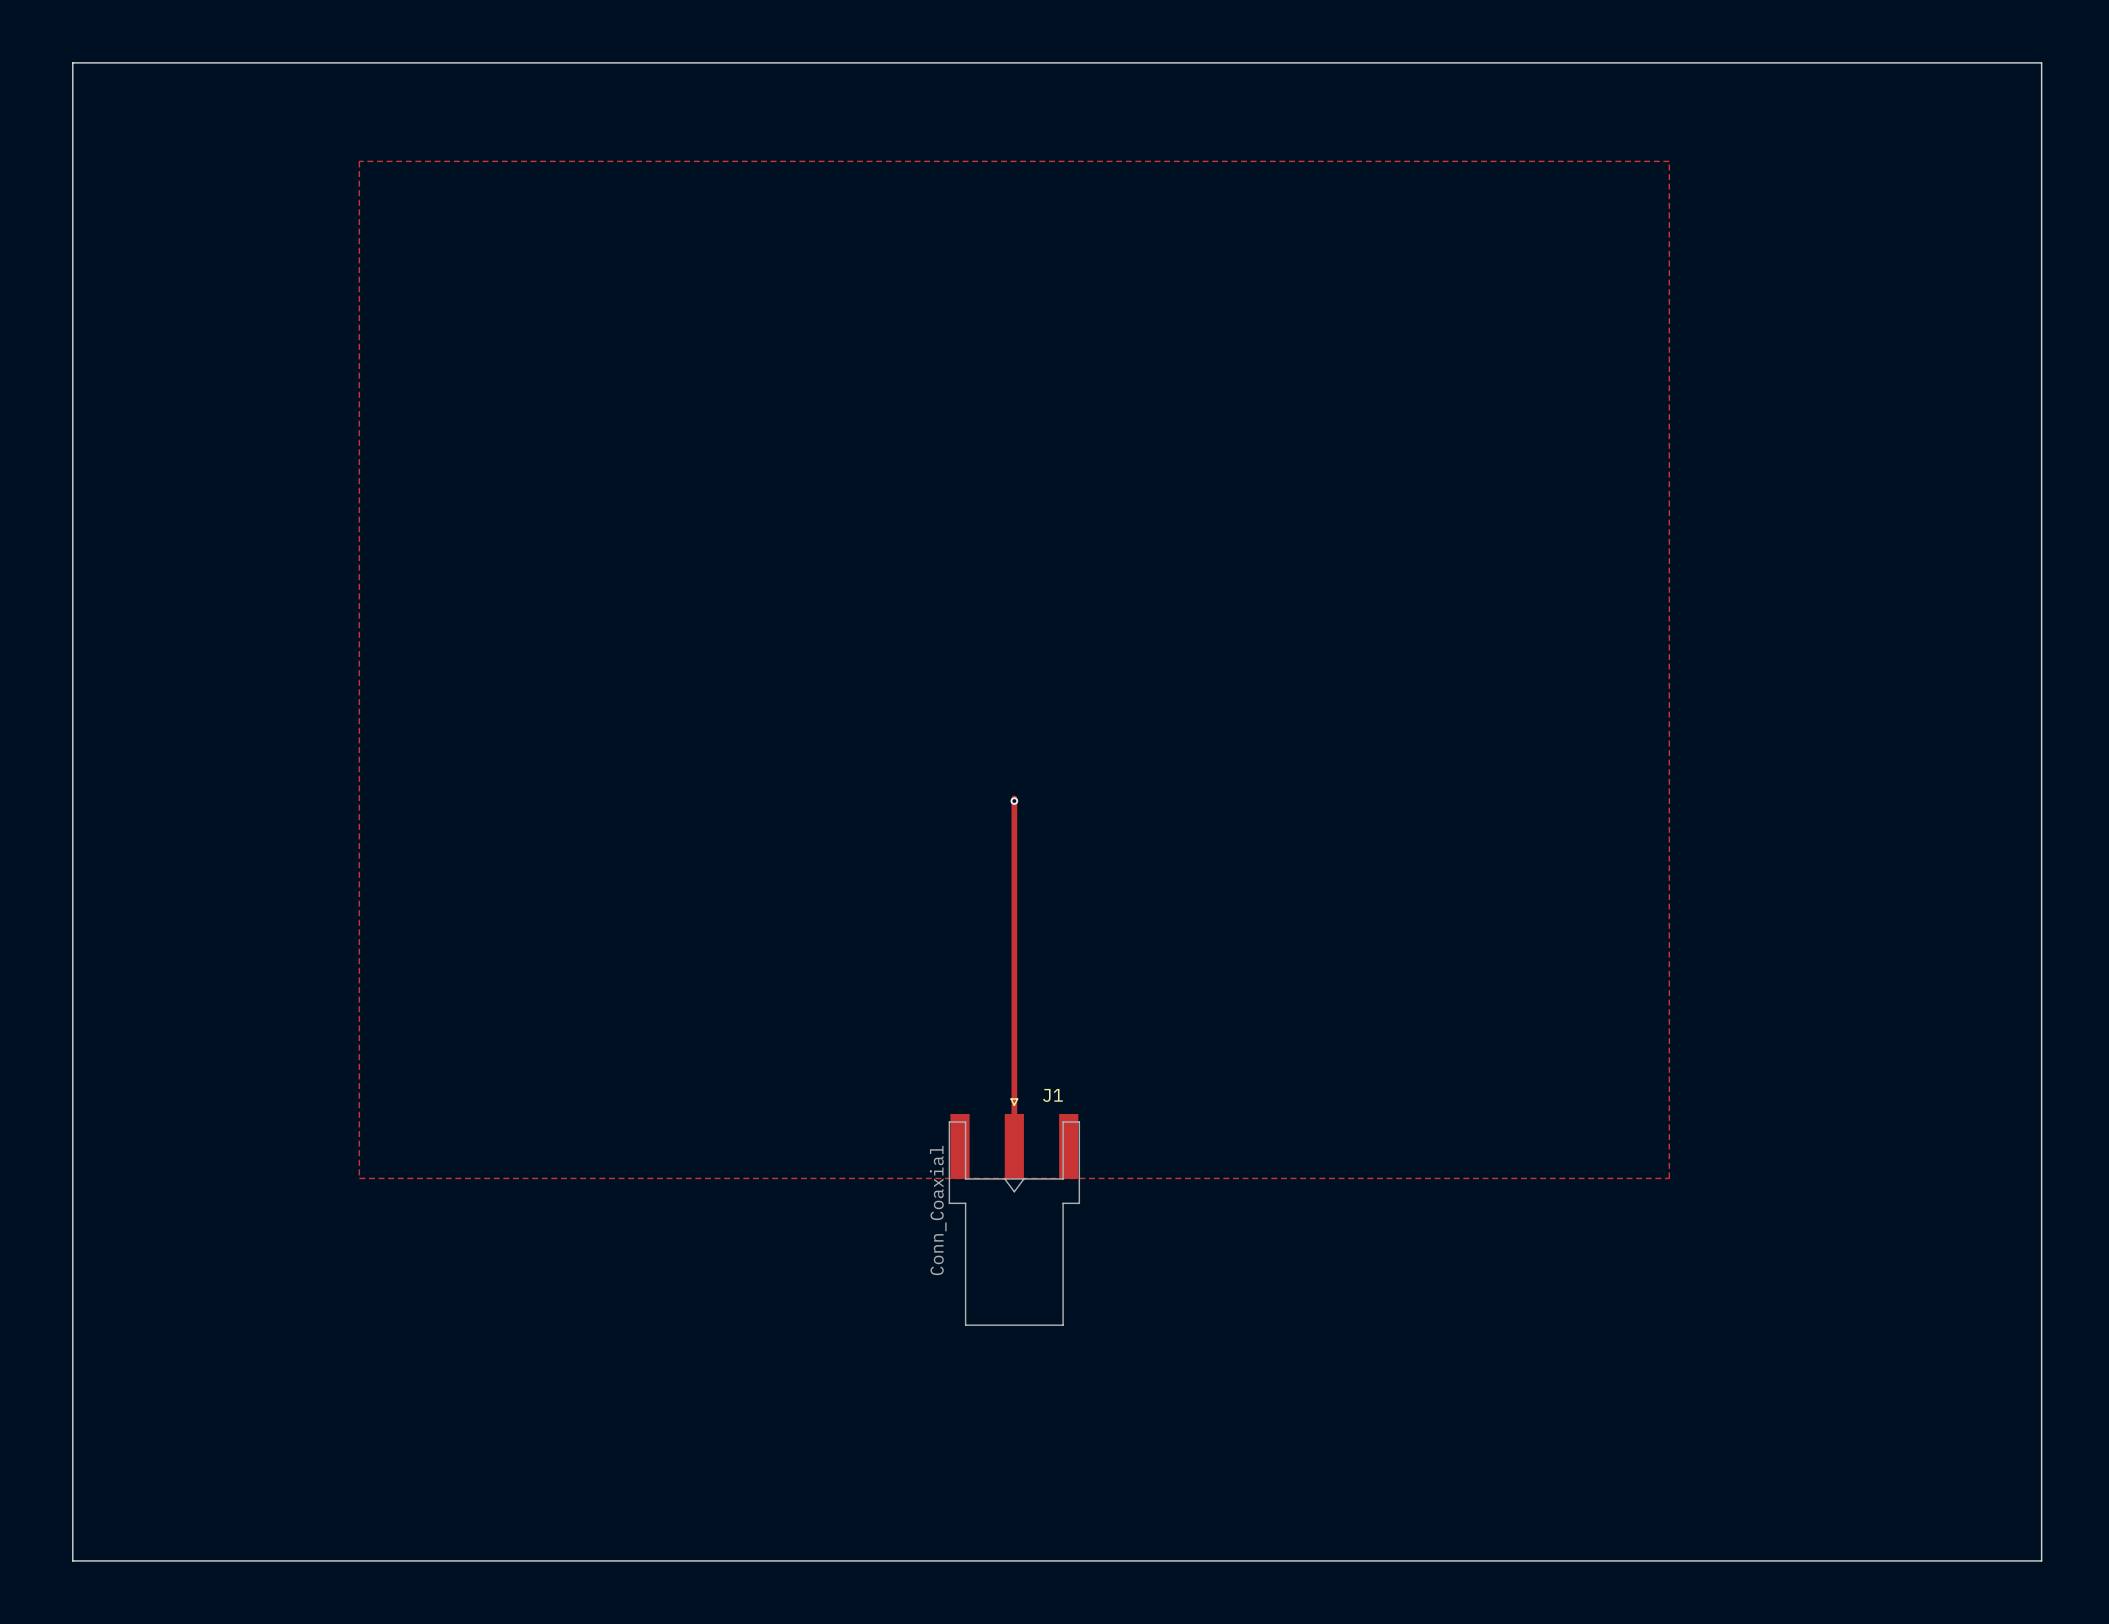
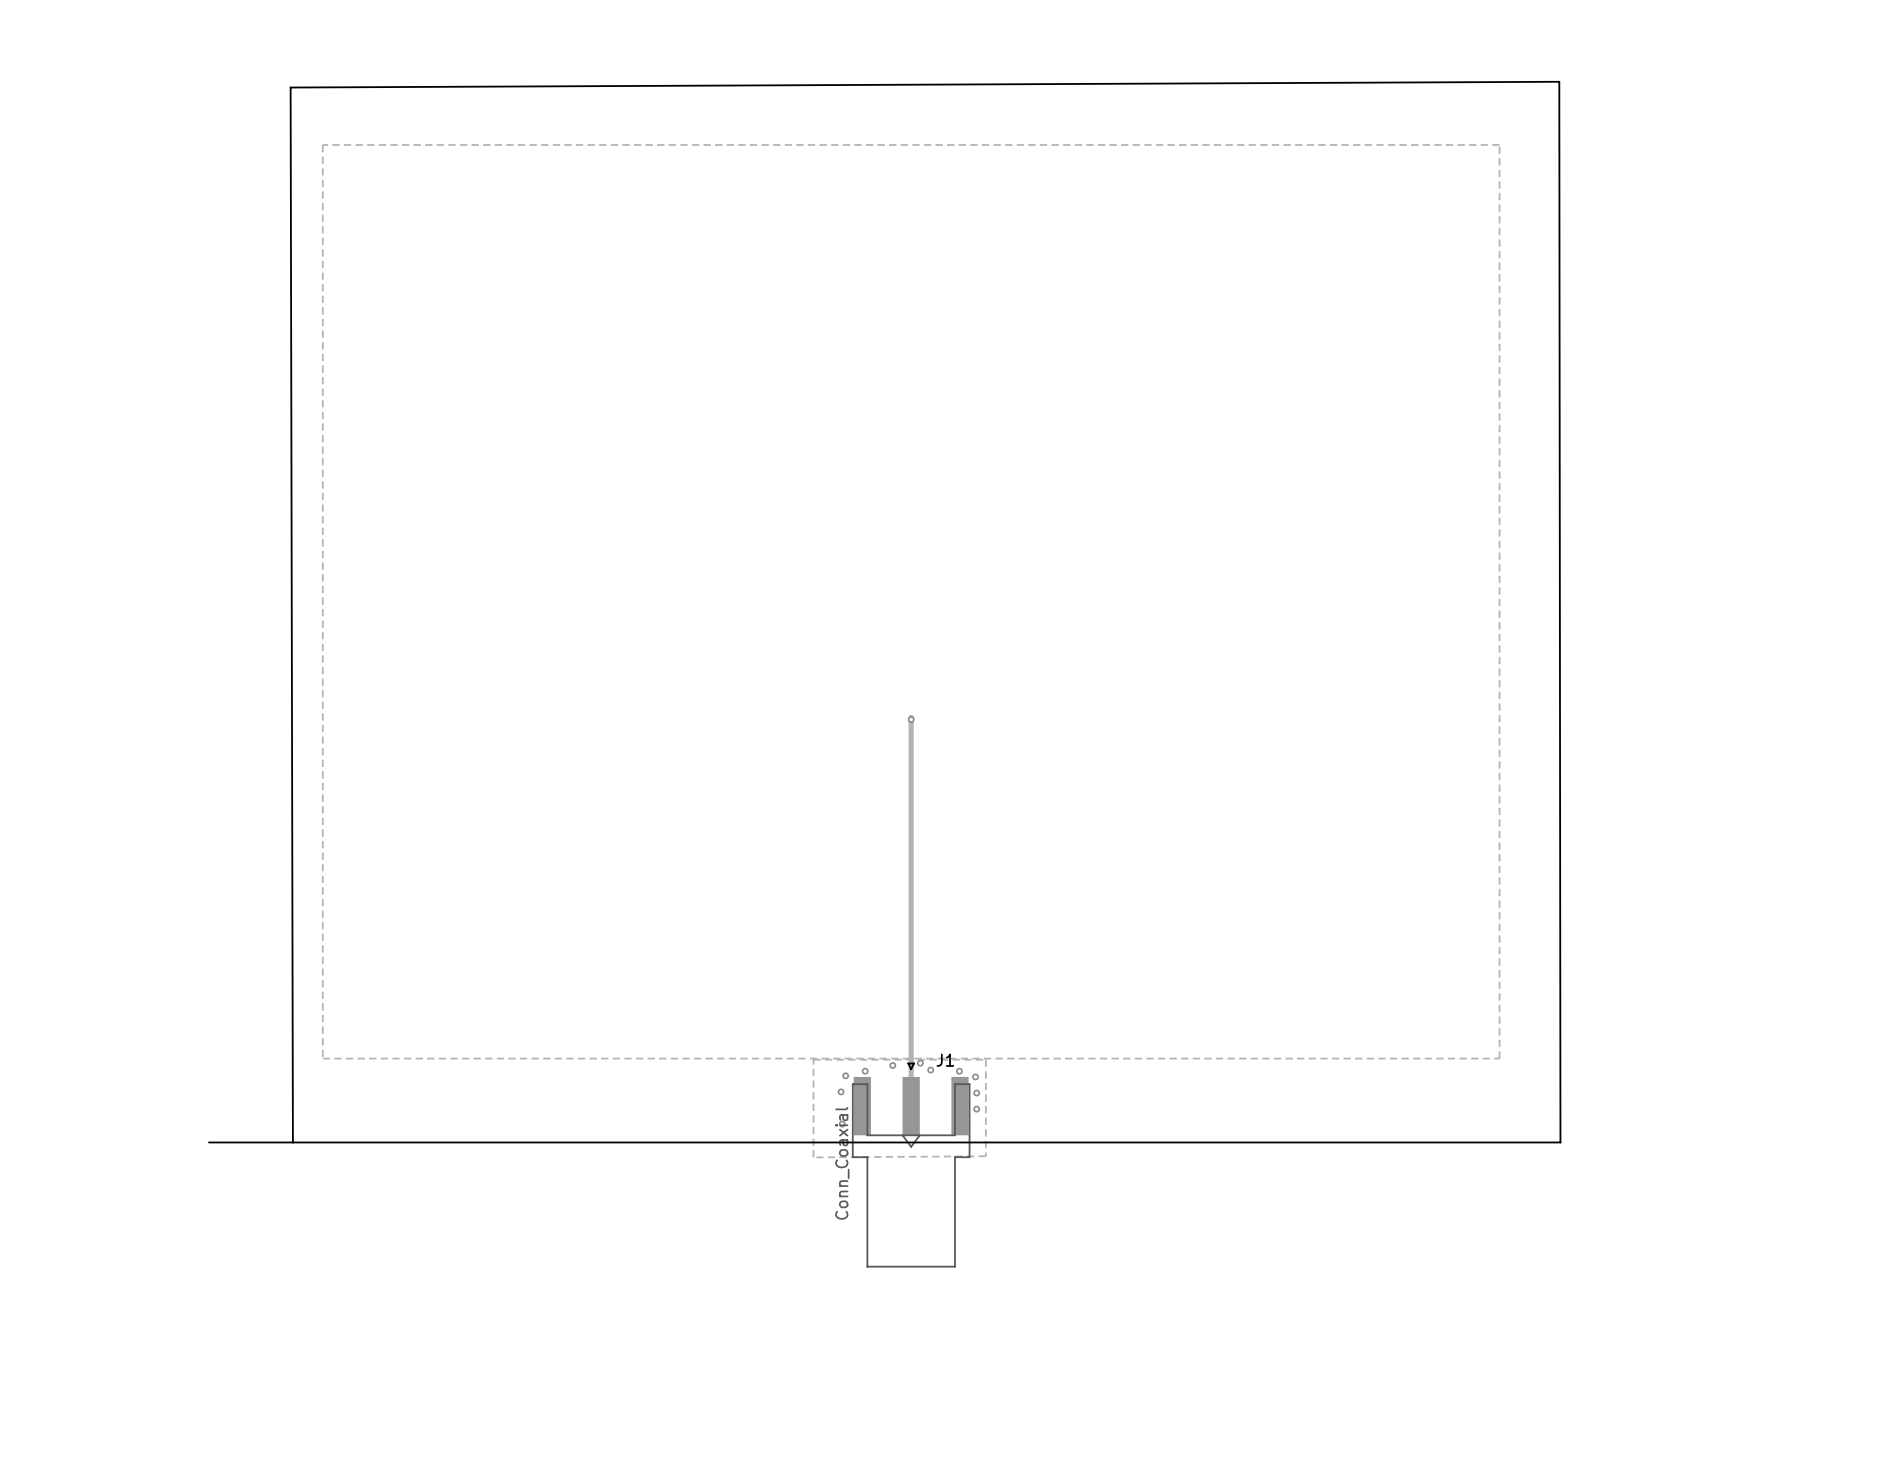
board edge: (72, 62) (2041, 62) (2041, 1560) (72, 1560) (72, 62) -> none
track: none -> (911, 1029) (911, 1085)
zone outline: none -> (813, 1059) (813, 1157) (985, 1156) (985, 1059) (813, 1059)
via: none -> (920, 1063)
via: none -> (892, 1065)
via: none -> (930, 1070)
via: none -> (865, 1071)
via: none -> (959, 1071)
via: none -> (845, 1075)
via: none -> (975, 1076)
J1 position: (1014, 1212) -> (911, 1165)
via: none -> (841, 1091)
via: none -> (976, 1093)
via: none -> (976, 1109)
via: none -> (842, 1124)
board edge: none -> (209, 1142) (1560, 1142) (1559, 81) (290, 87) (292, 1142)

